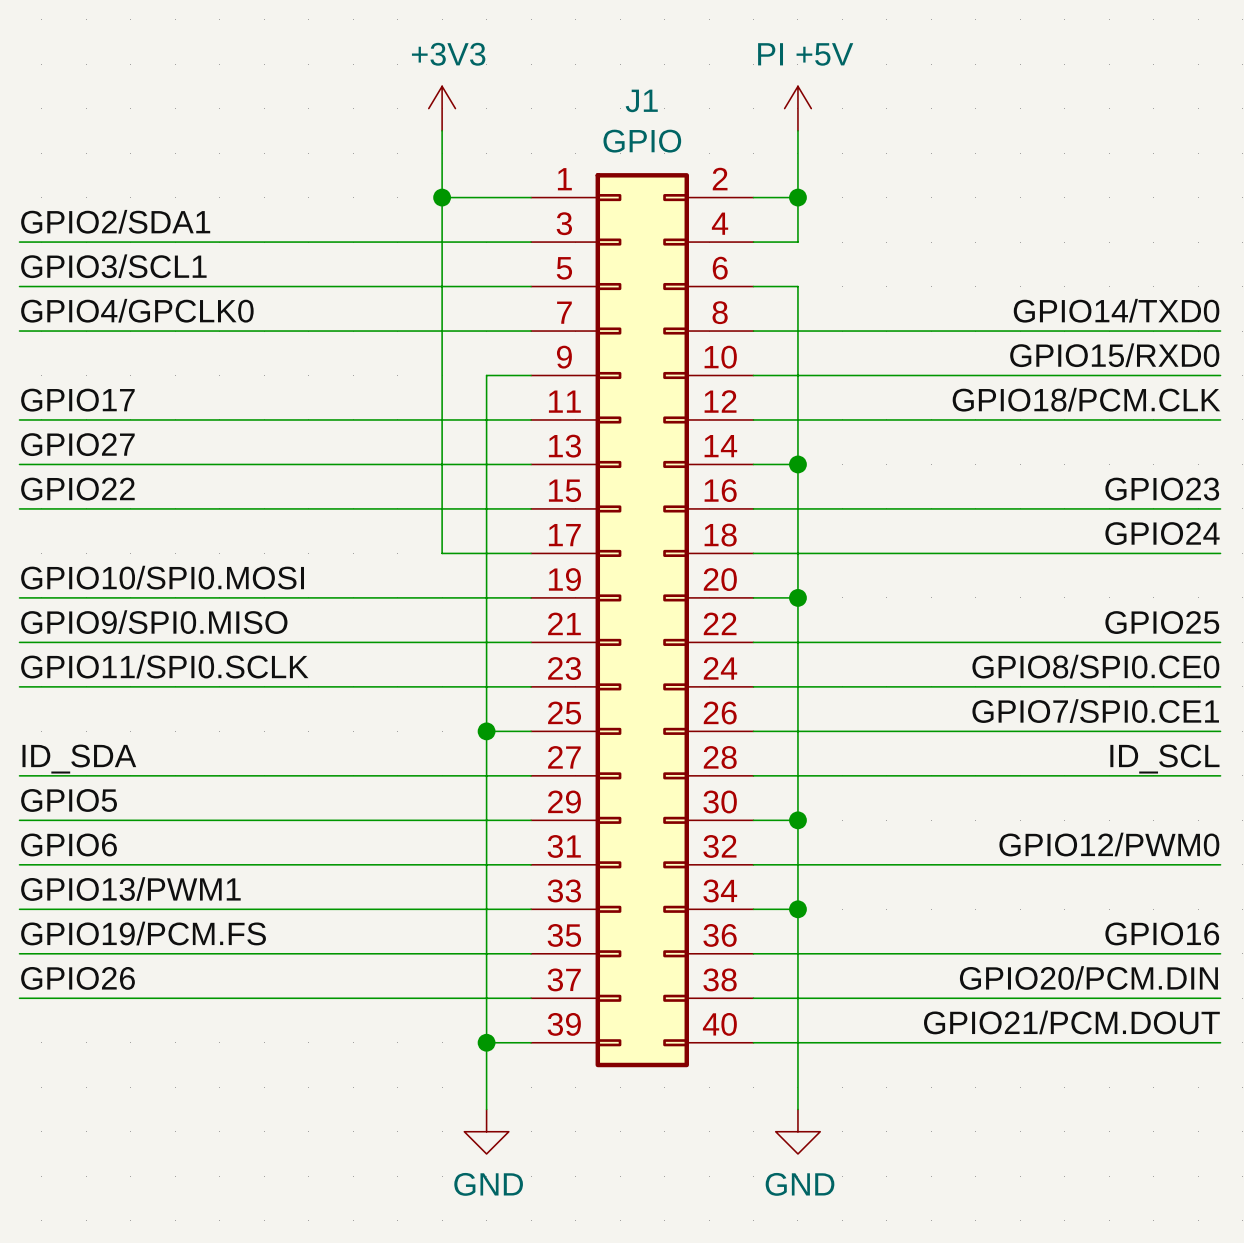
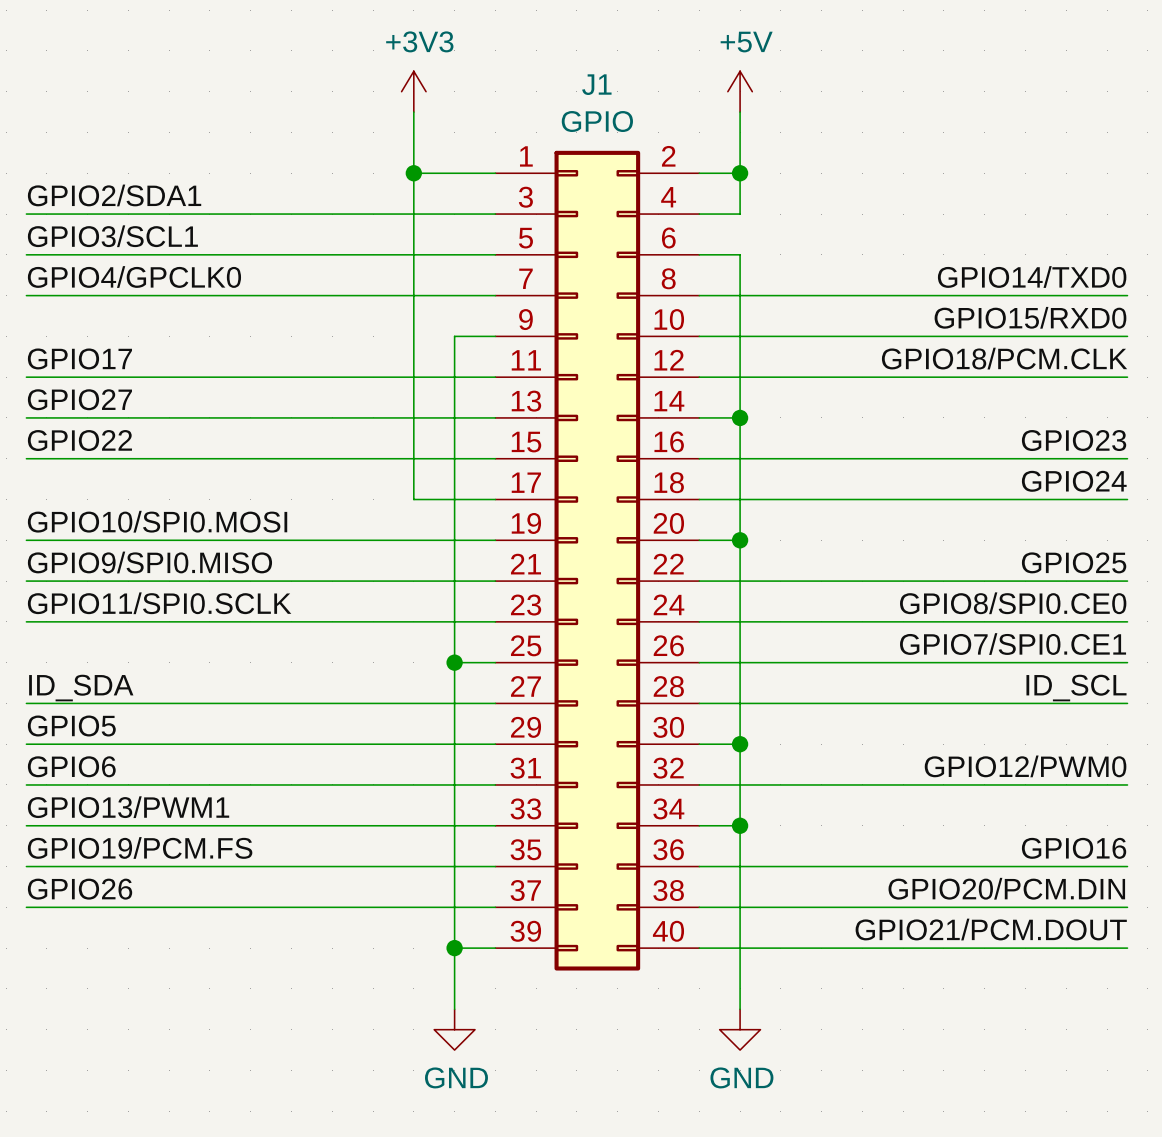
power symbol: PI +5V (797, 108) -> +5V (740, 91)

